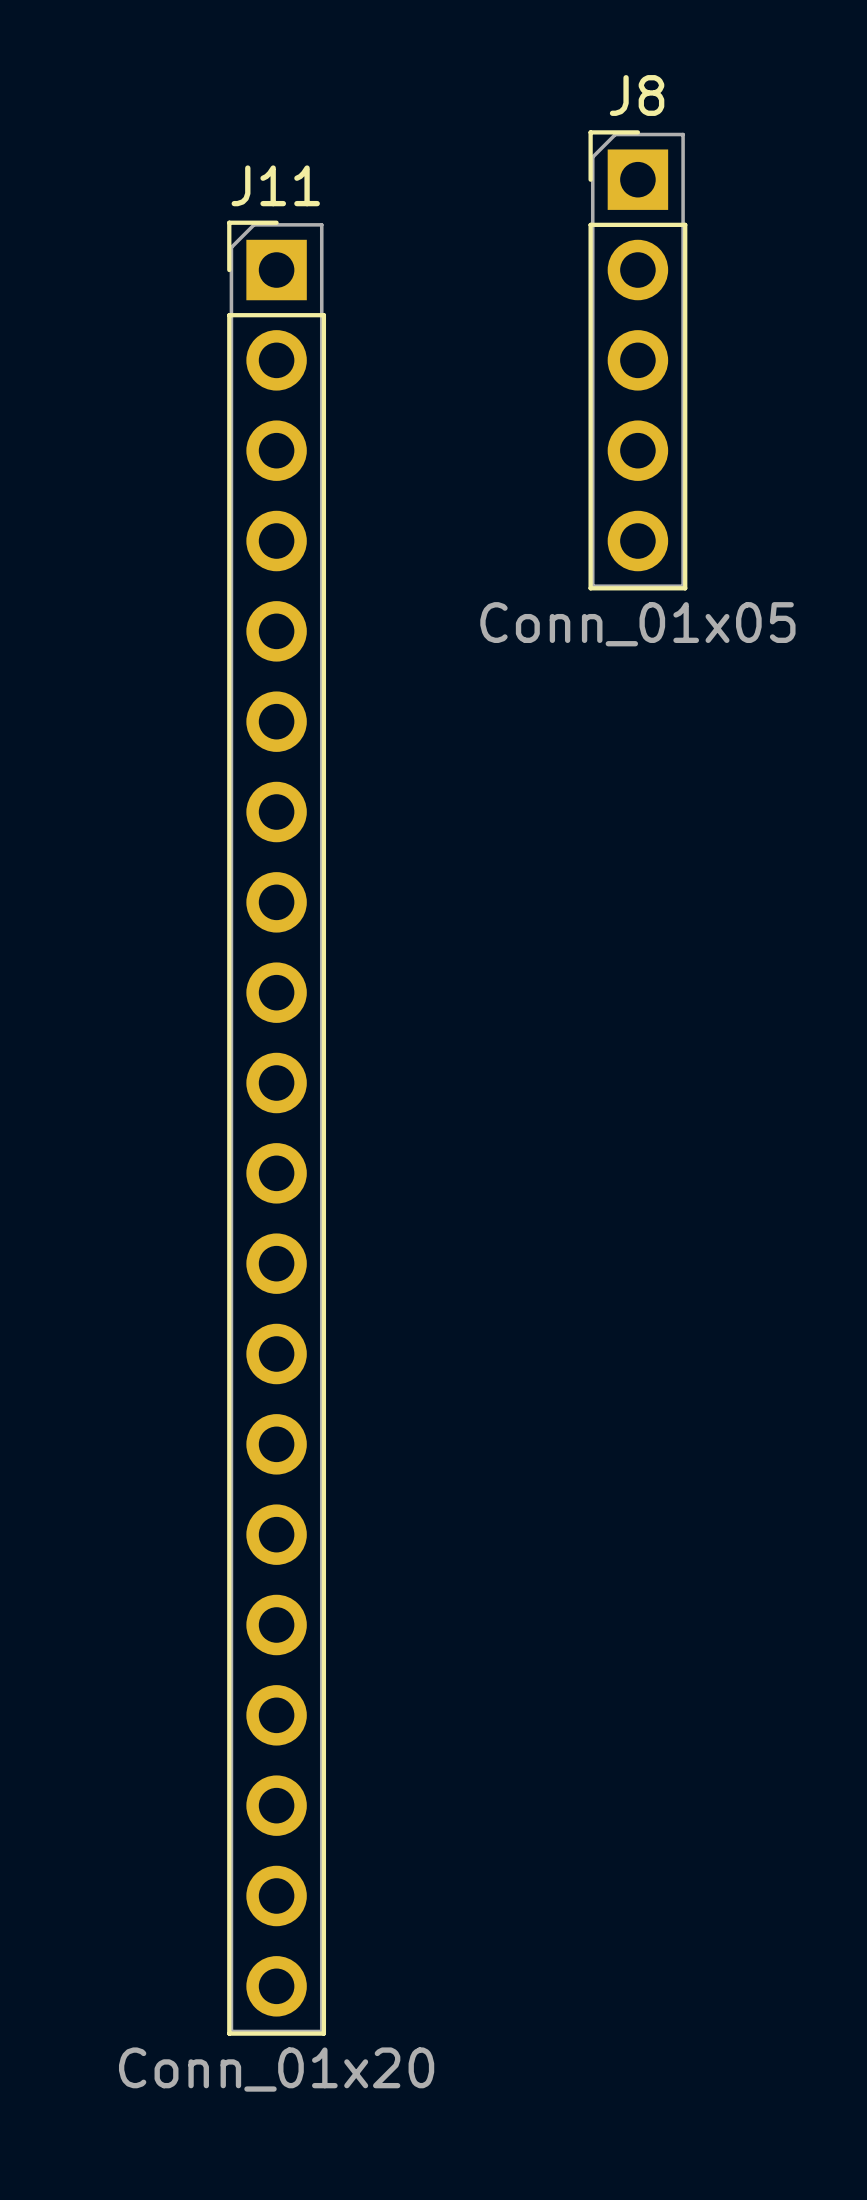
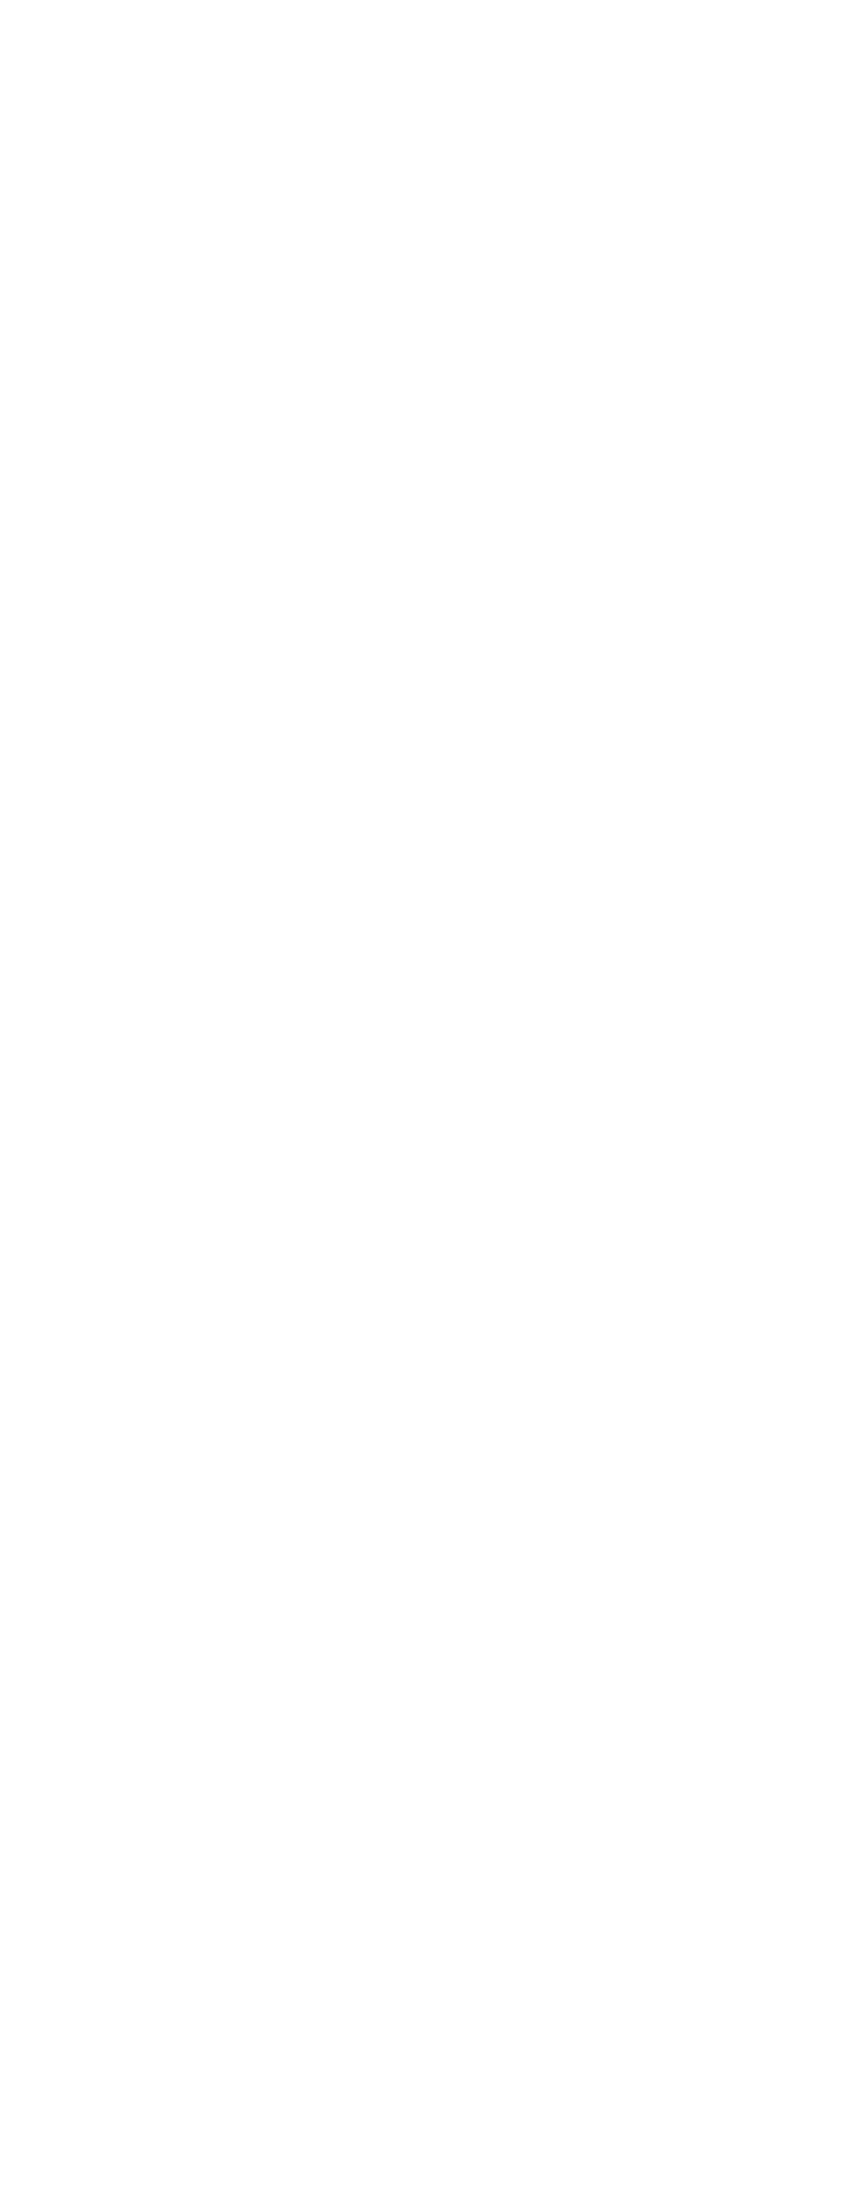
J8: Conn_01x05 (637, 360) -> none
J11: Conn_01x20 (276, 1128) -> none

